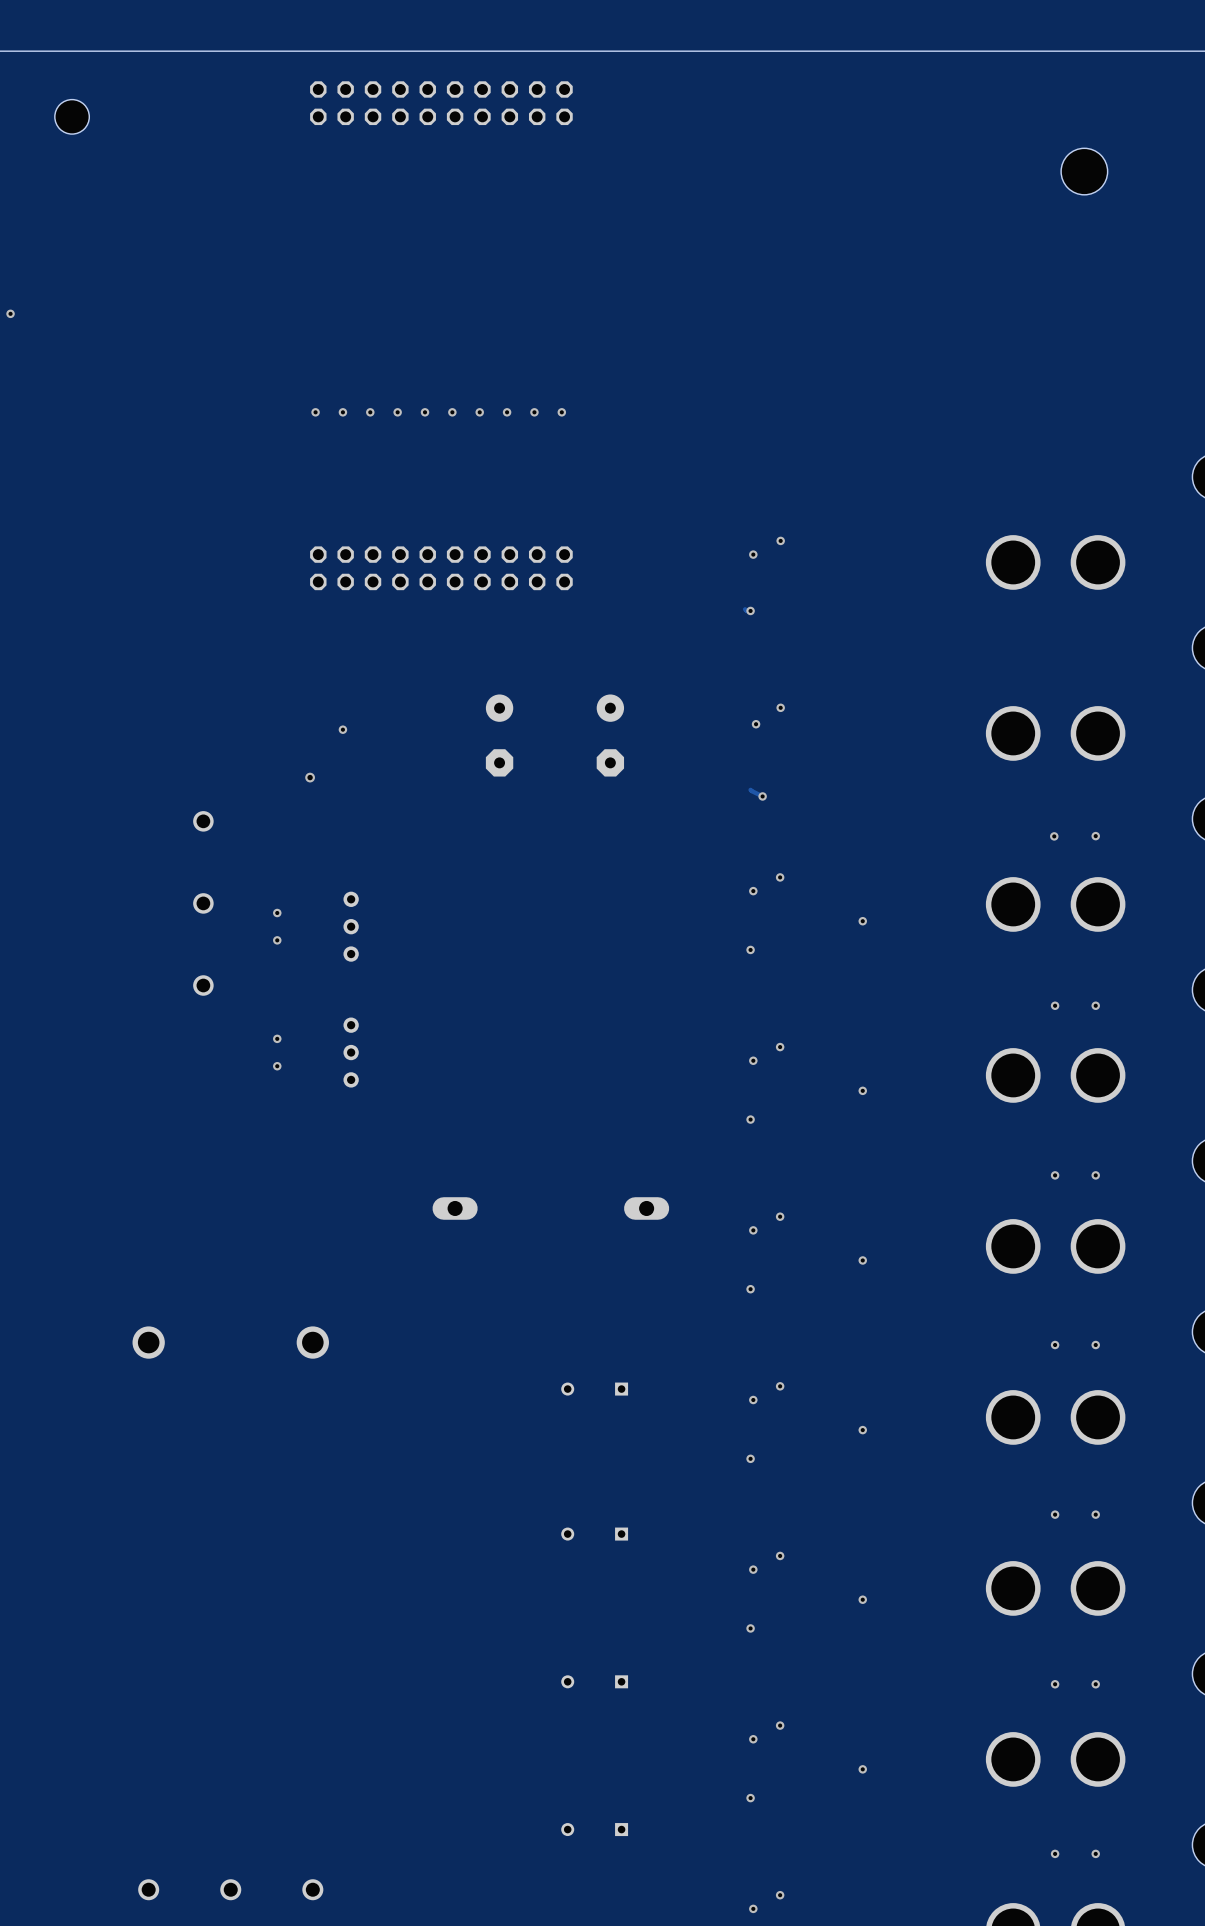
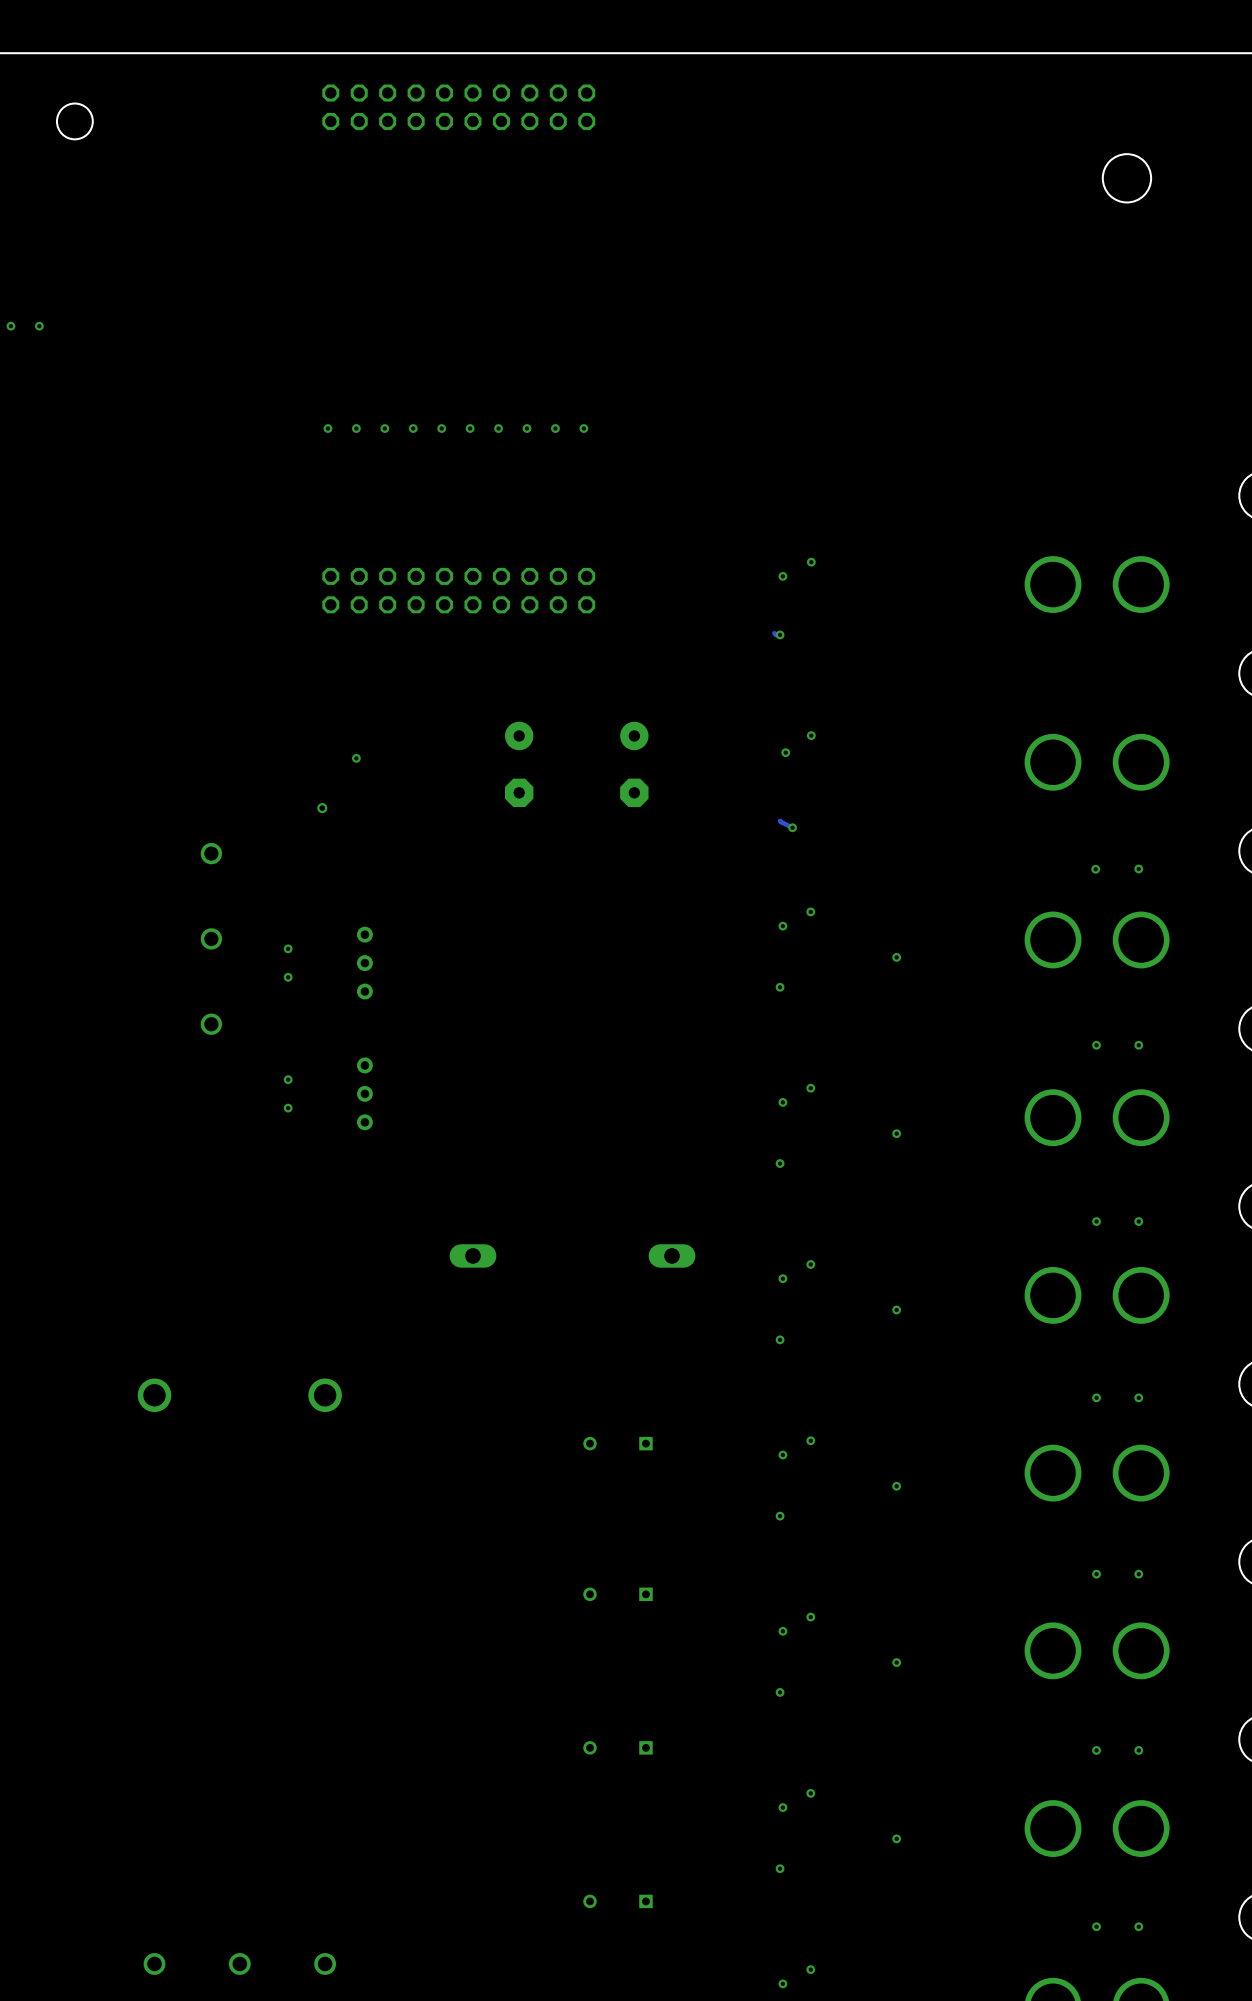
via: none -> (39, 326)

